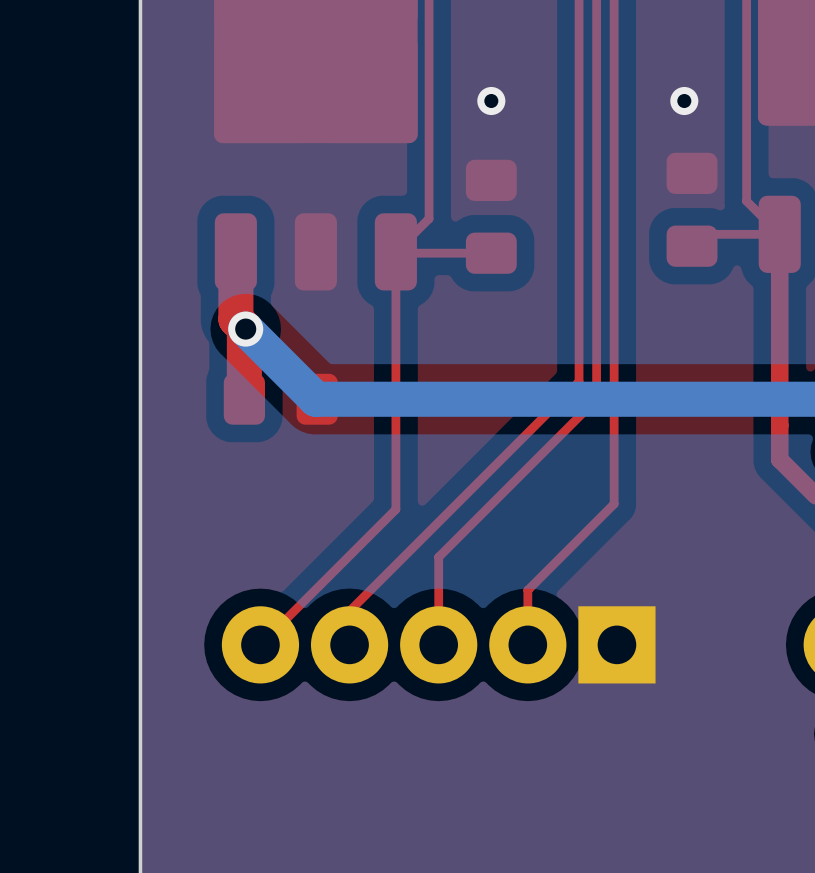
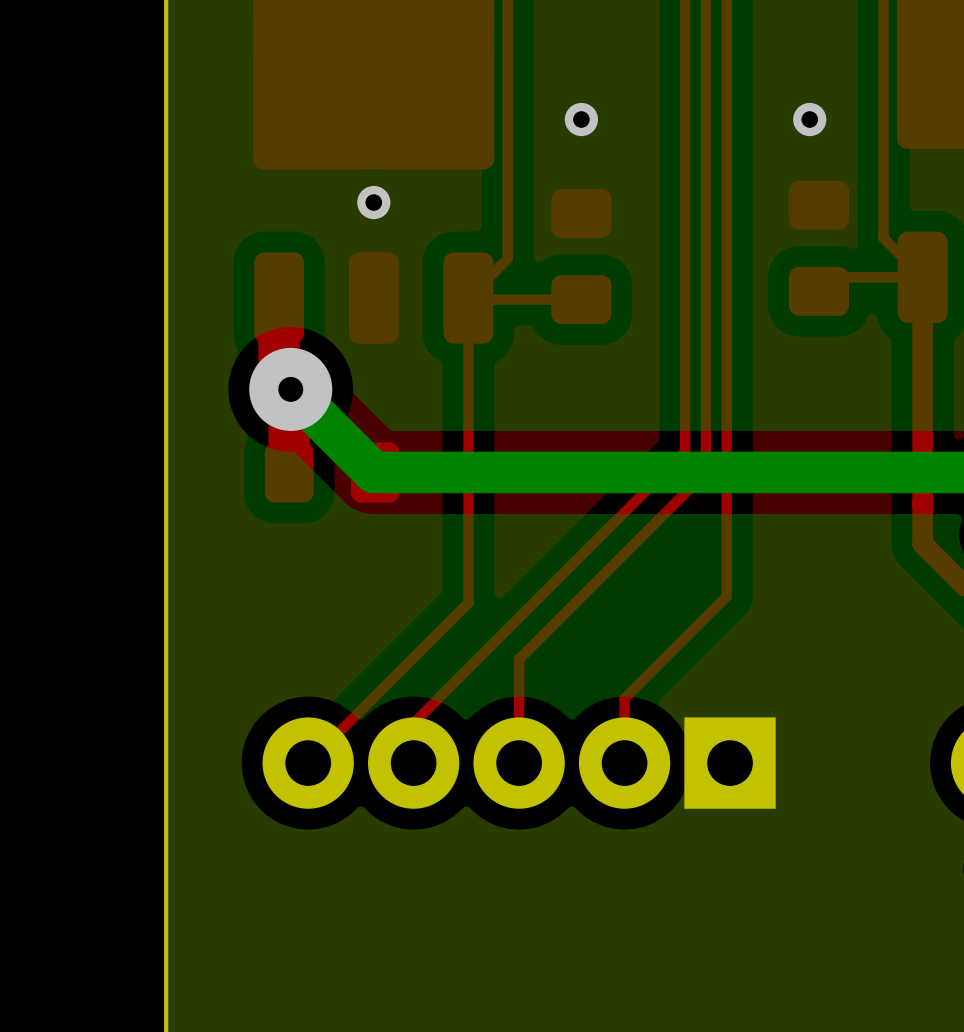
via: none -> (373, 202)
via size: [228, 311, 264, 347] -> [249, 347, 333, 431]

